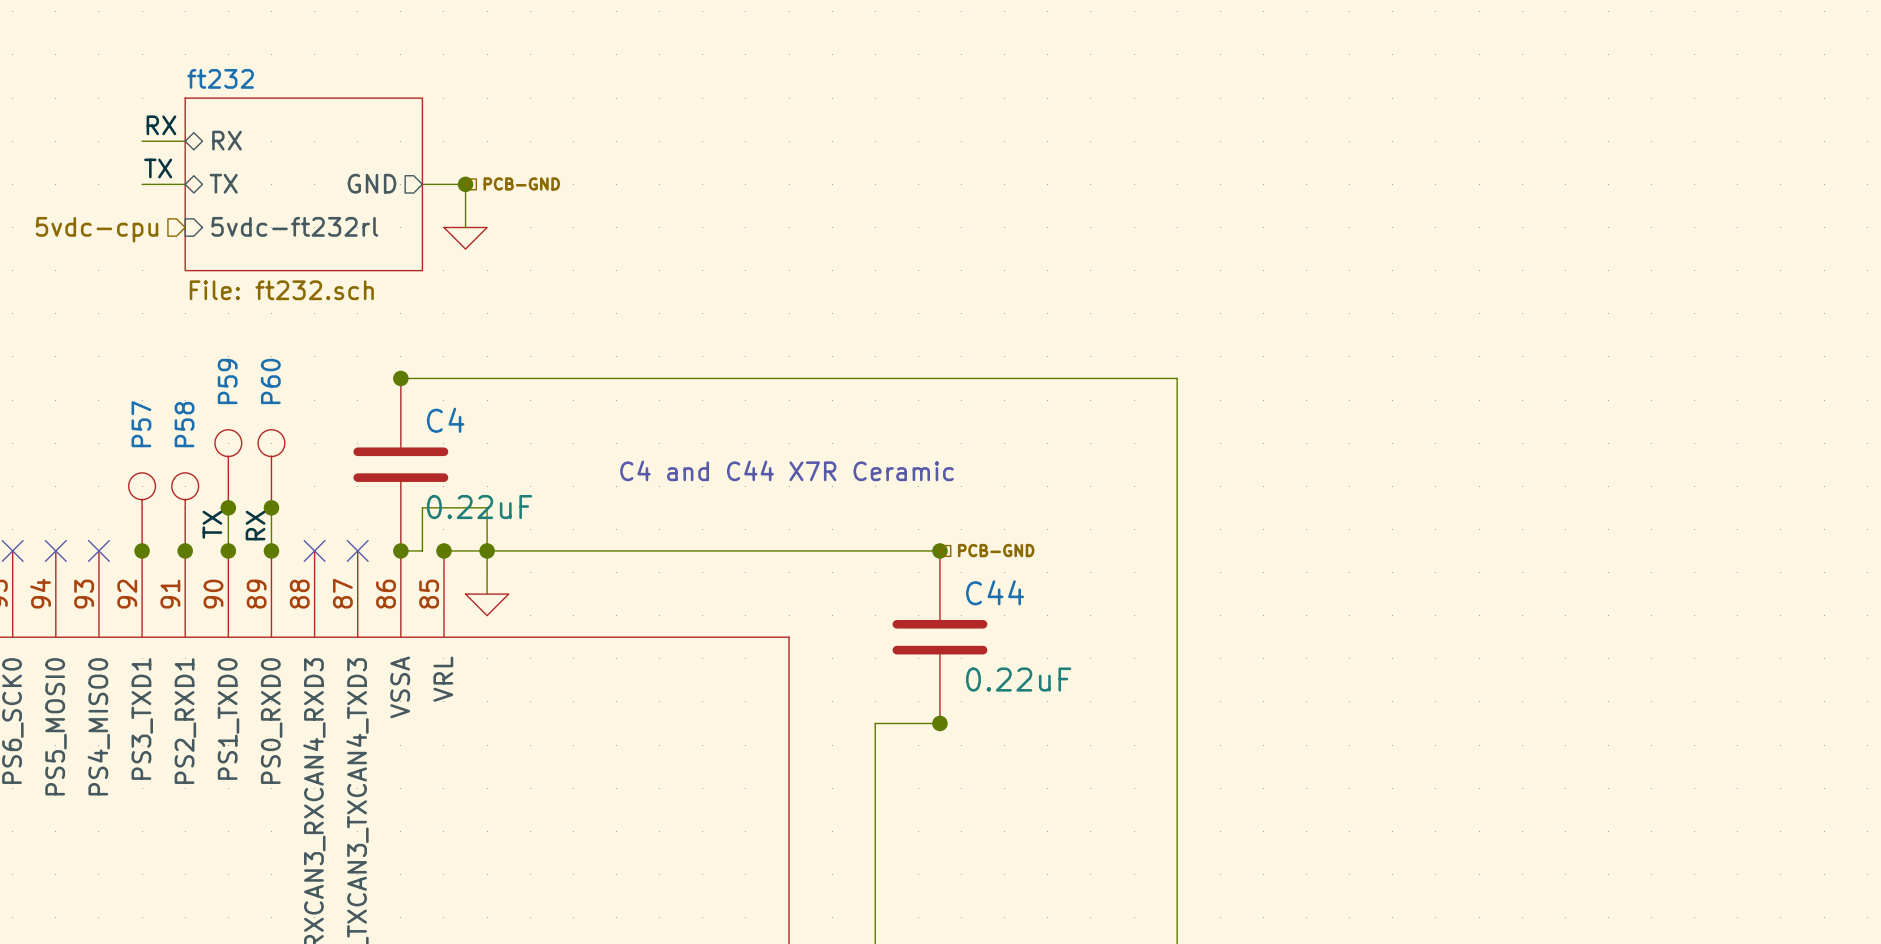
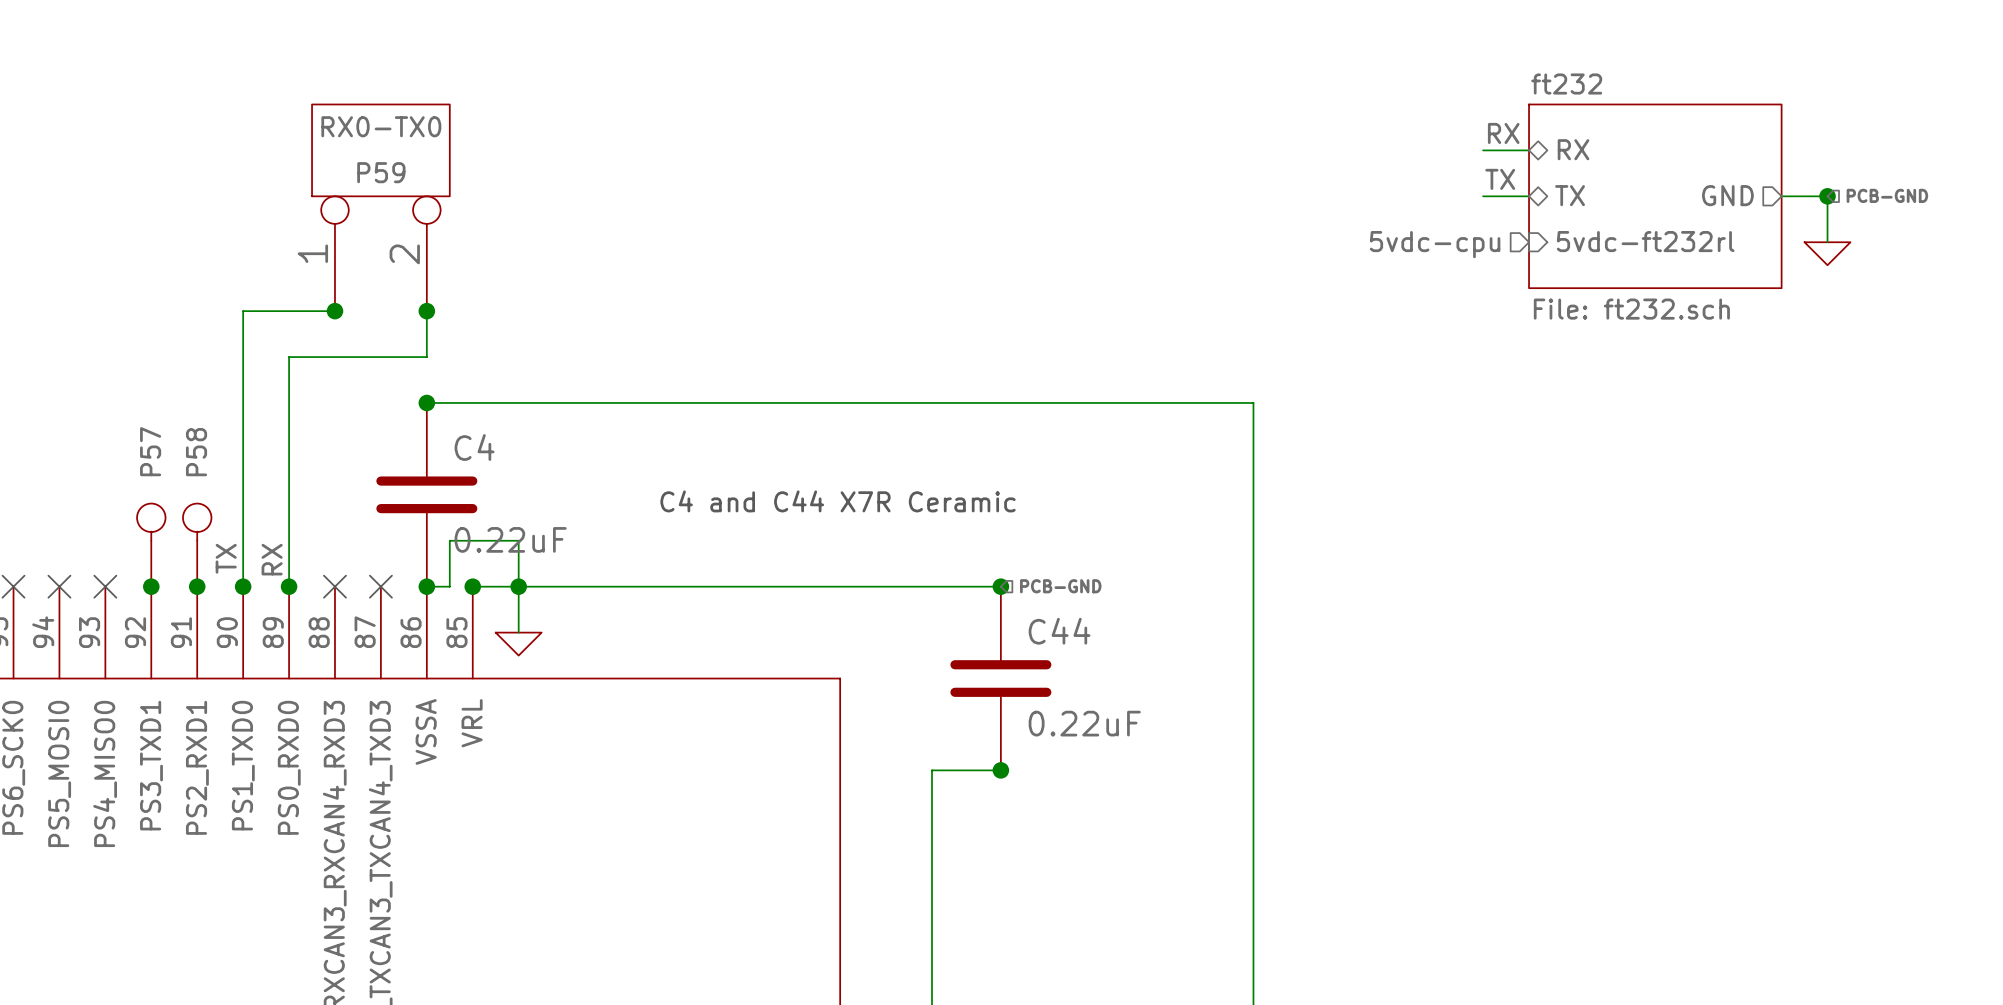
P59 value: none -> RX0-TX0 (381, 126)
label: RX (161, 125) -> none
label: none -> RX (1503, 133)
sheet pin: RX (227, 140) -> none
sheet pin: none -> RX (1573, 149)
wire: (142, 141) (185, 141) -> none
wire: none -> (1483, 150) (1529, 150)
label: TX (158, 168) -> none
label: none -> TX (1500, 179)
sheet pin: TX (223, 183) -> none
sheet pin: GND (371, 183) -> none
hierarchical label: PCB-GND (521, 183) -> none
sheet pin: none -> TX (1570, 195)
sheet pin: none -> GND (1727, 195)
hierarchical label: none -> PCB-GND (1887, 195)
wire: (142, 184) (185, 184) -> none
sheet ft232 position: (303, 184) -> (1655, 196)
wire: (422, 184) (465, 184) (465, 227) -> none
junction: (465, 184) -> none
wire: none -> (1483, 196) (1529, 196)
wire: none -> (1781, 196) (1827, 196) (1827, 242)
junction: none -> (1827, 196)
sheet pin: 5vdc-ft232rl (294, 226) -> none
sheet pin: none -> 5vdc-ft232rl (1645, 241)
hierarchical label: 5vdc-cpu (97, 229) -> none
hierarchical label: none -> 5vdc-cpu (1435, 244)
power symbol: (465, 238) -> none
power symbol: none -> (1827, 253)
wire: none -> (334, 311) (243, 311) (243, 540)
junction: none -> (334, 311)
wire: none -> (426, 311) (426, 357) (289, 357) (289, 540)
junction: none -> (426, 311)
P59 name position: P59 (227, 381) -> P59 (381, 172)
P59 symbol: [214, 429, 242, 508] -> [312, 104, 450, 312]
P60: (271, 468) -> none
junction: (228, 507) -> none
junction: (271, 507) -> none

